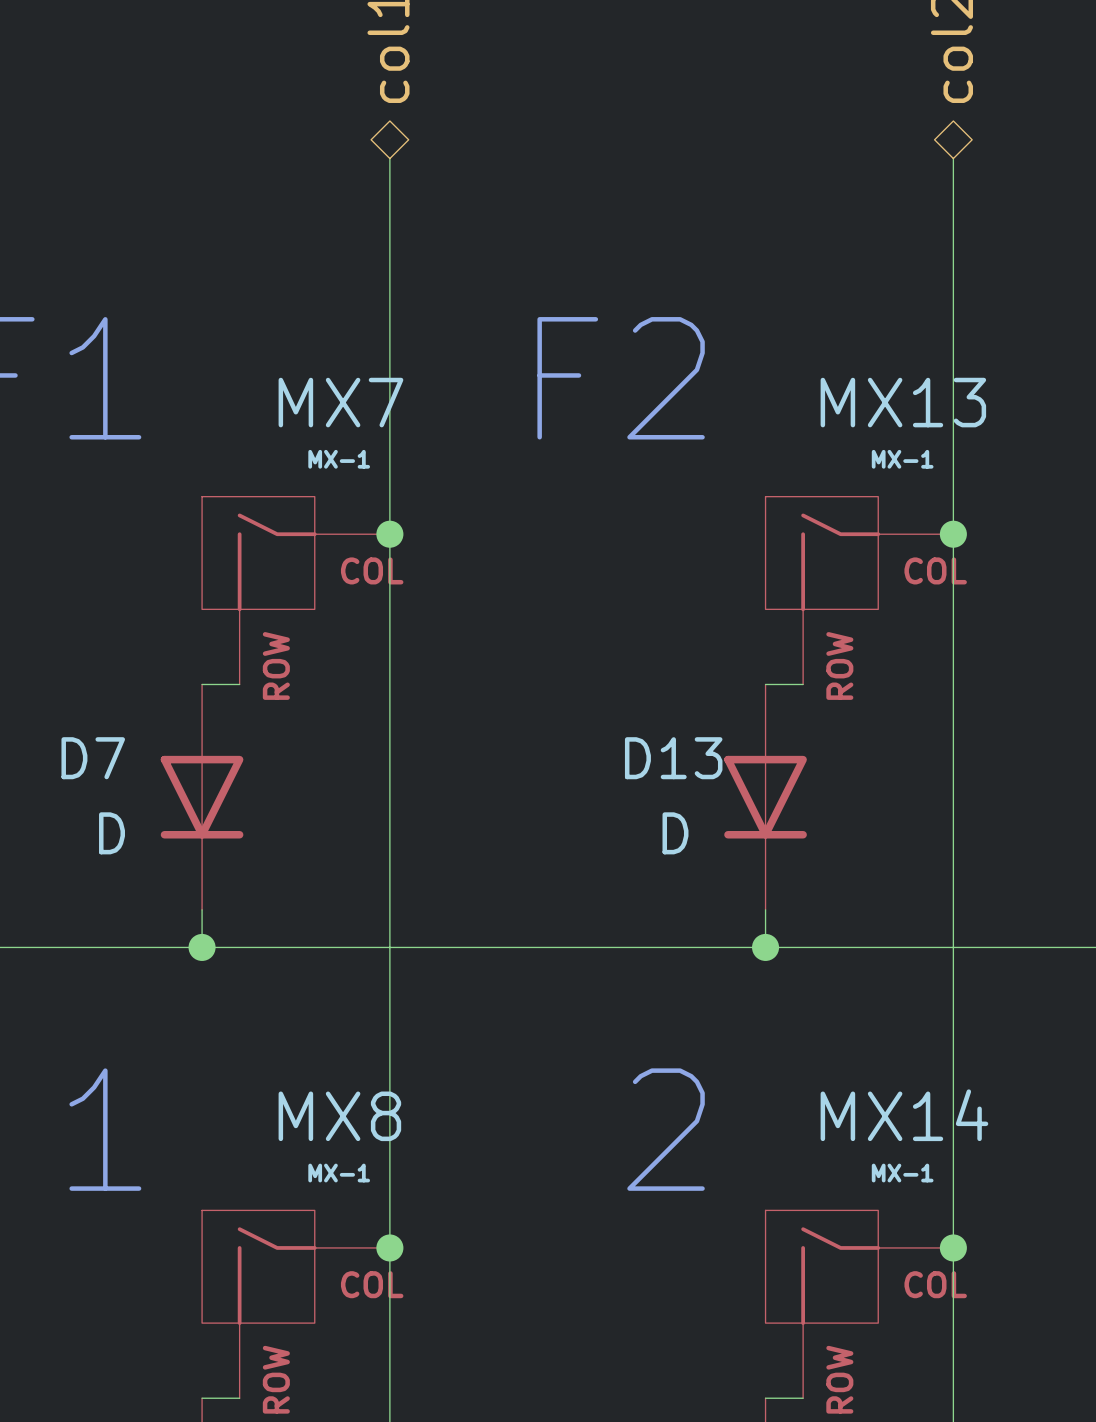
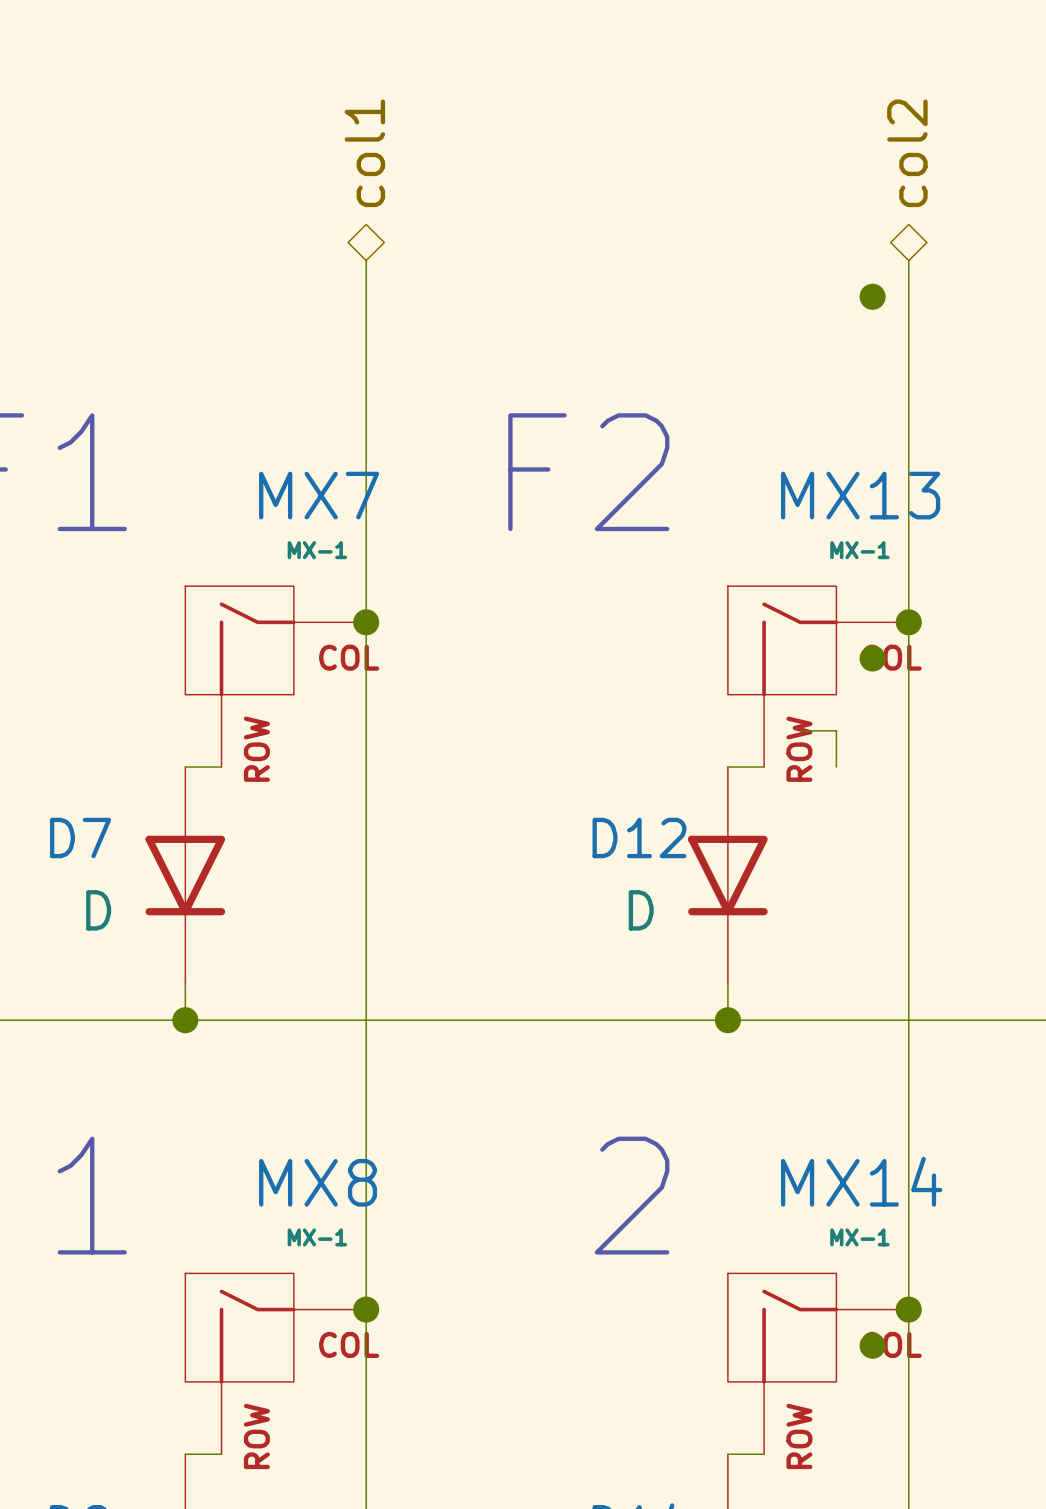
junction: none -> (872, 296)
junction: none -> (872, 658)
wire: none -> (800, 730) (836, 730) (836, 767)
D13 name: D13 (673, 758) -> D12 (639, 838)
junction: none -> (872, 1345)

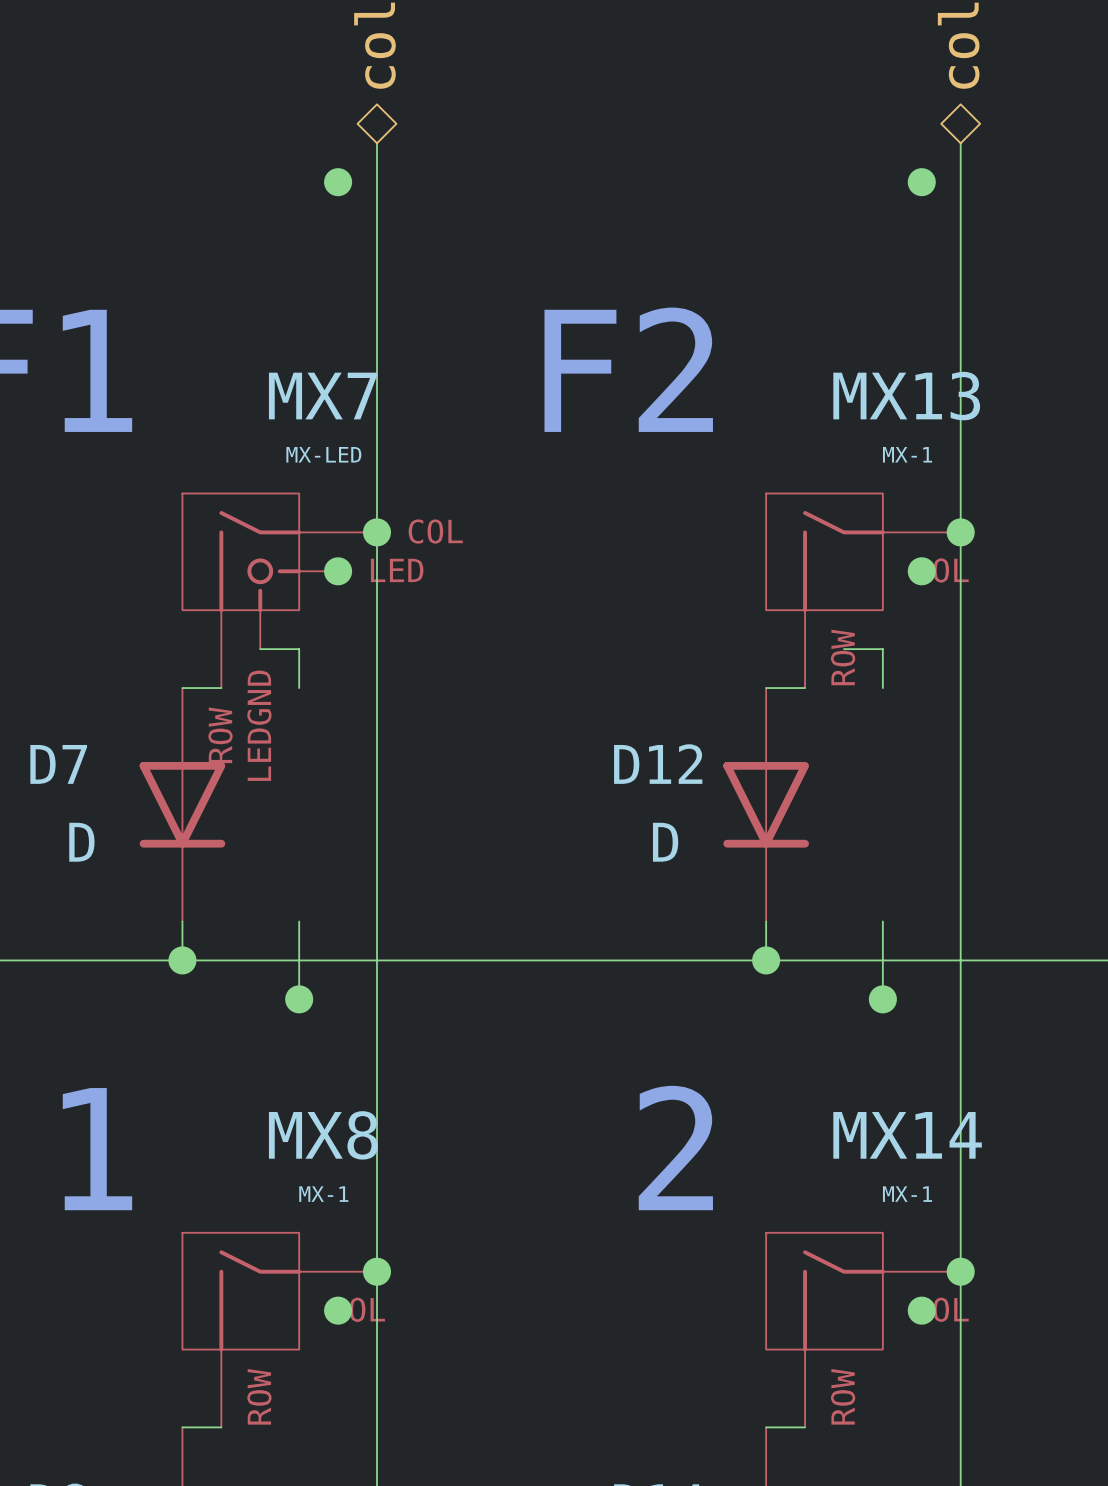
junction: none -> (338, 182)
MX7 value: MX-1 (317, 550) -> MX-LED (323, 454)
MX7 symbol: [185, 586, 367, 768] -> [182, 493, 378, 689]
junction: none -> (338, 571)
wire: none -> (260, 649) (299, 649) (299, 688)
wire: none -> (299, 921) (299, 999)
wire: none -> (882, 921) (882, 999)
junction: none -> (299, 999)
junction: none -> (882, 999)
junction: none -> (338, 1310)

